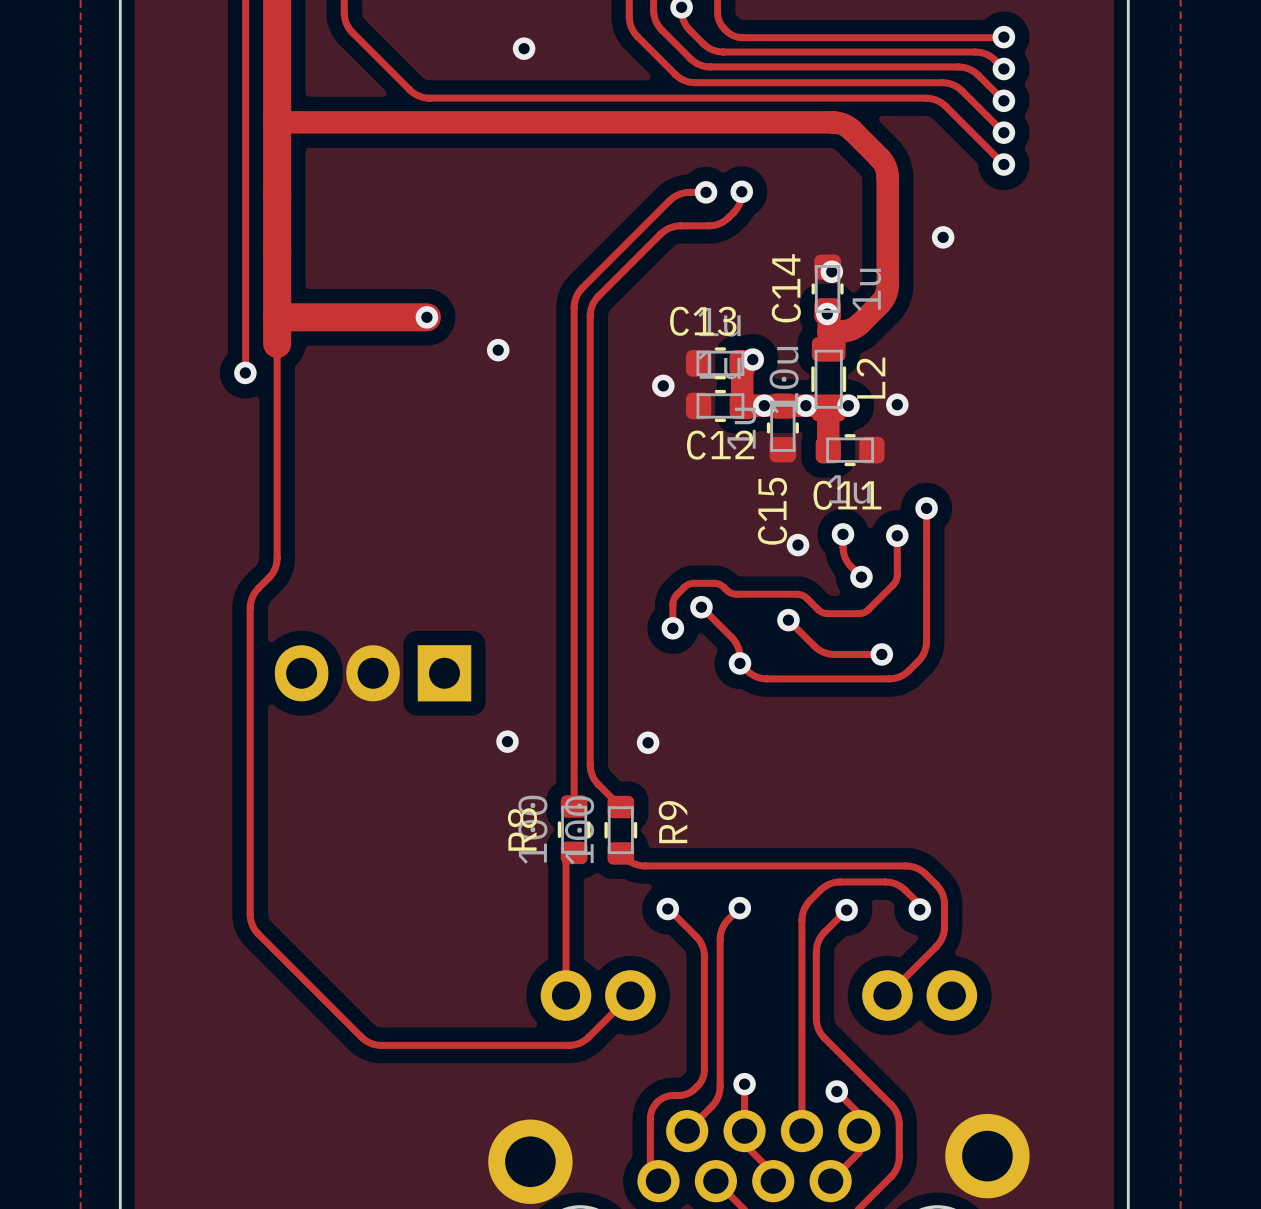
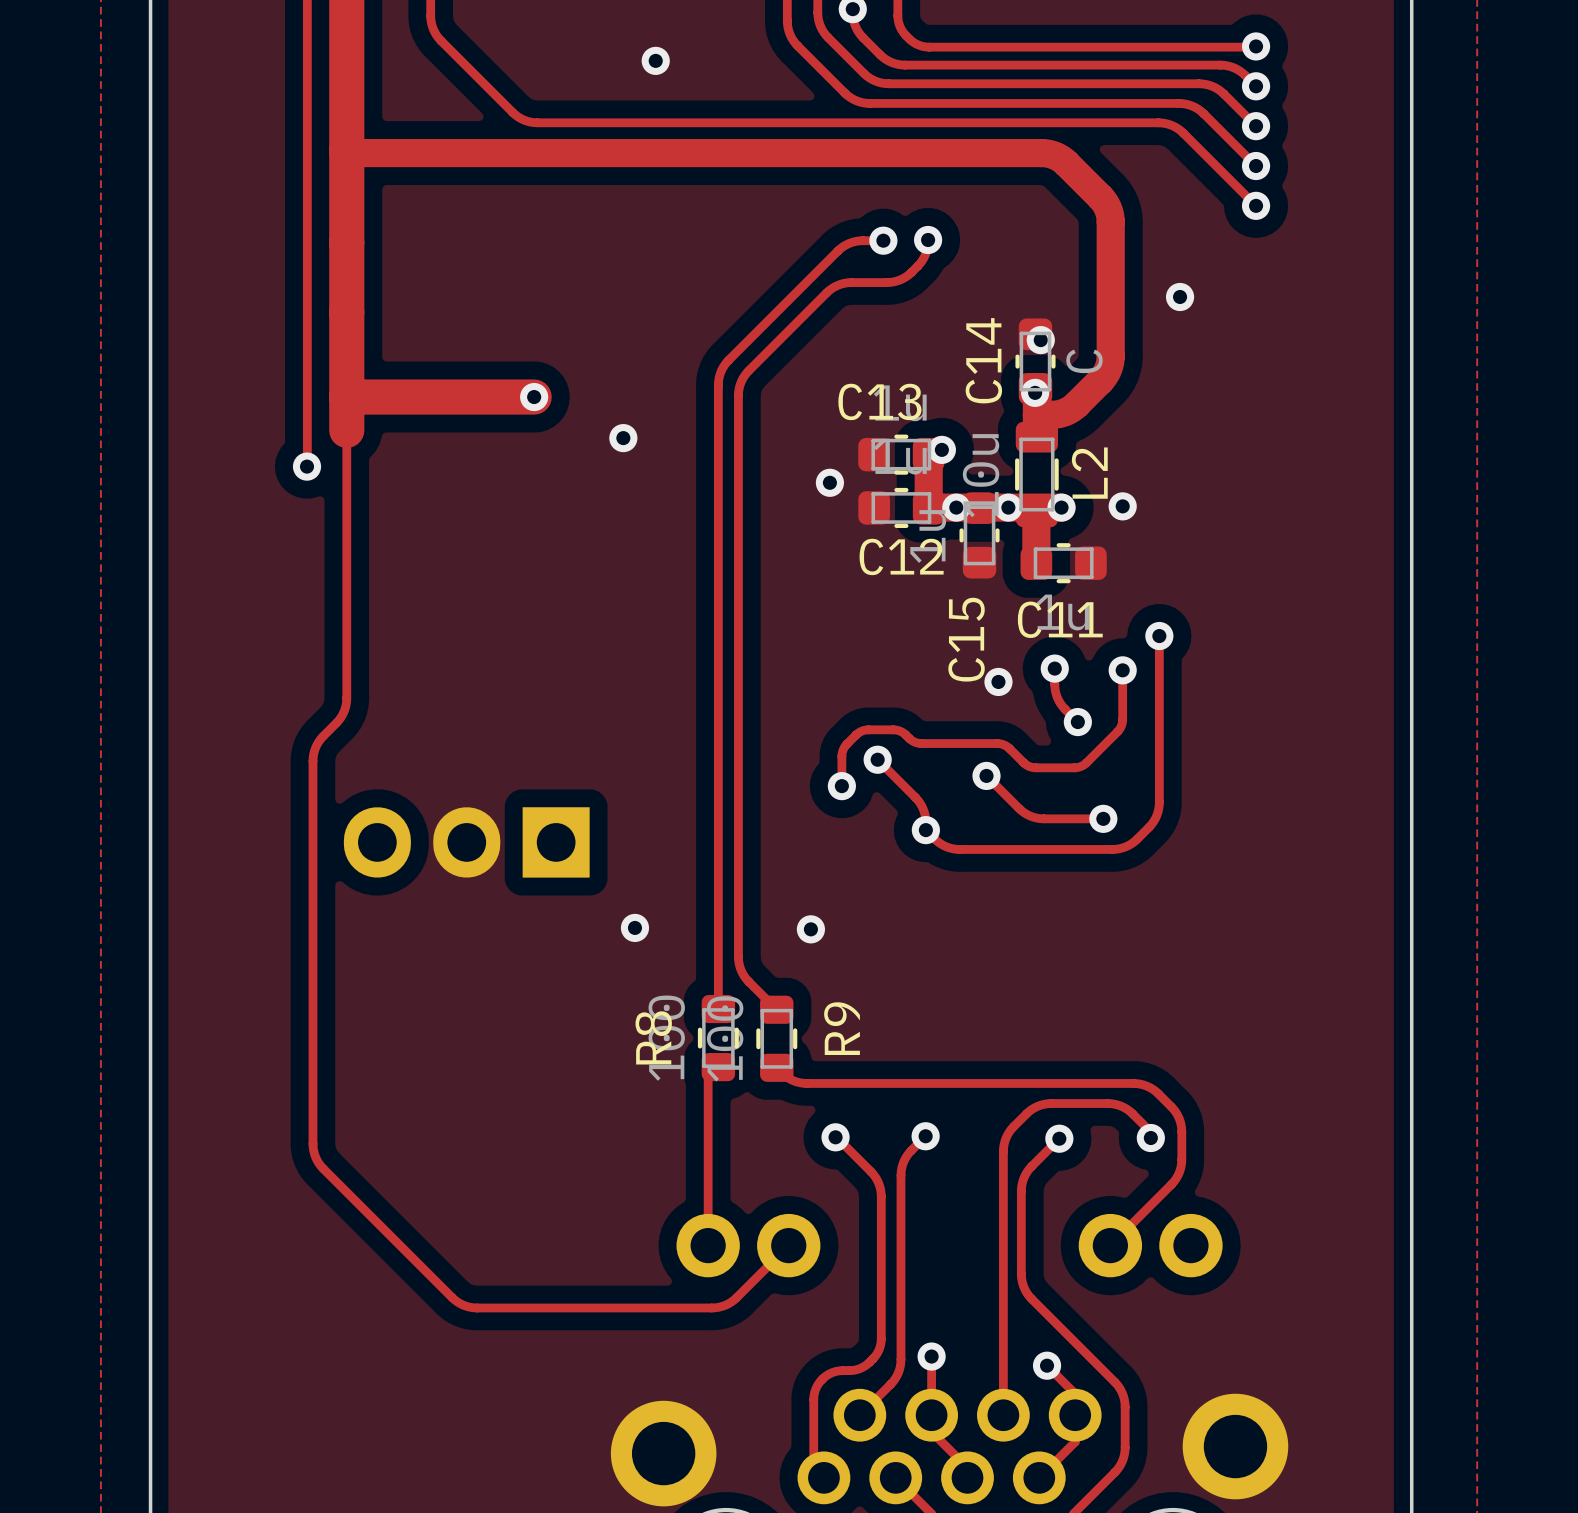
C14 value: 1u (867, 289) -> C (1084, 361)

